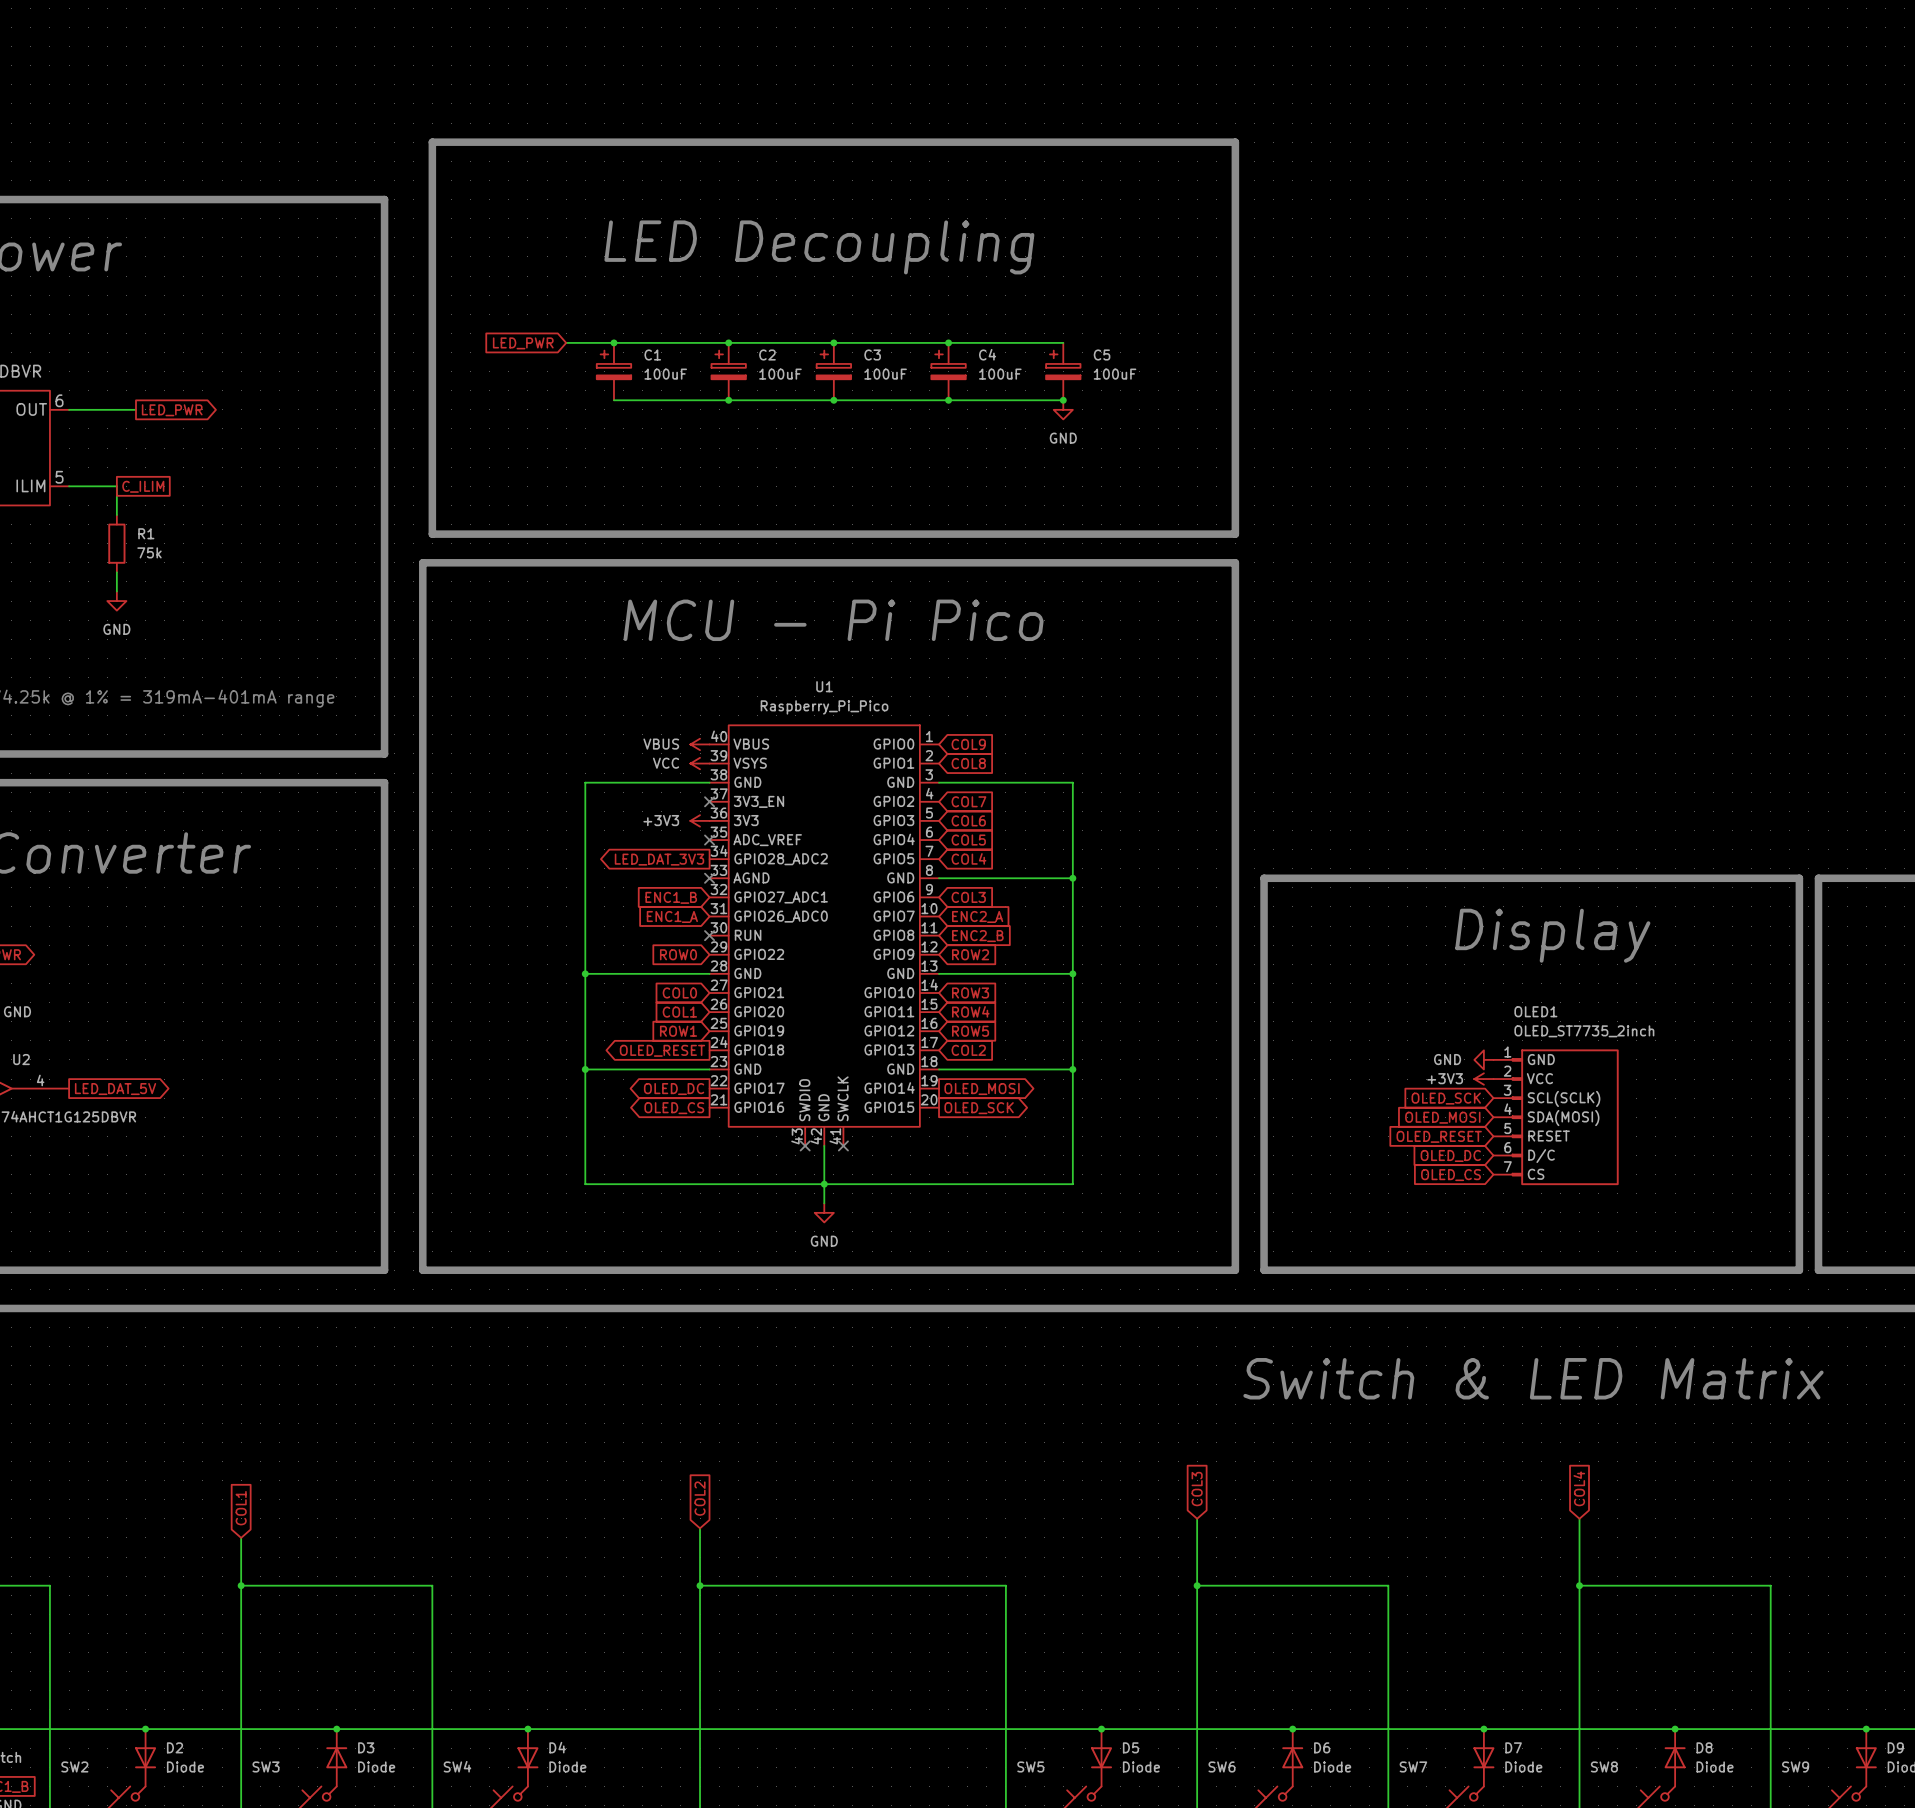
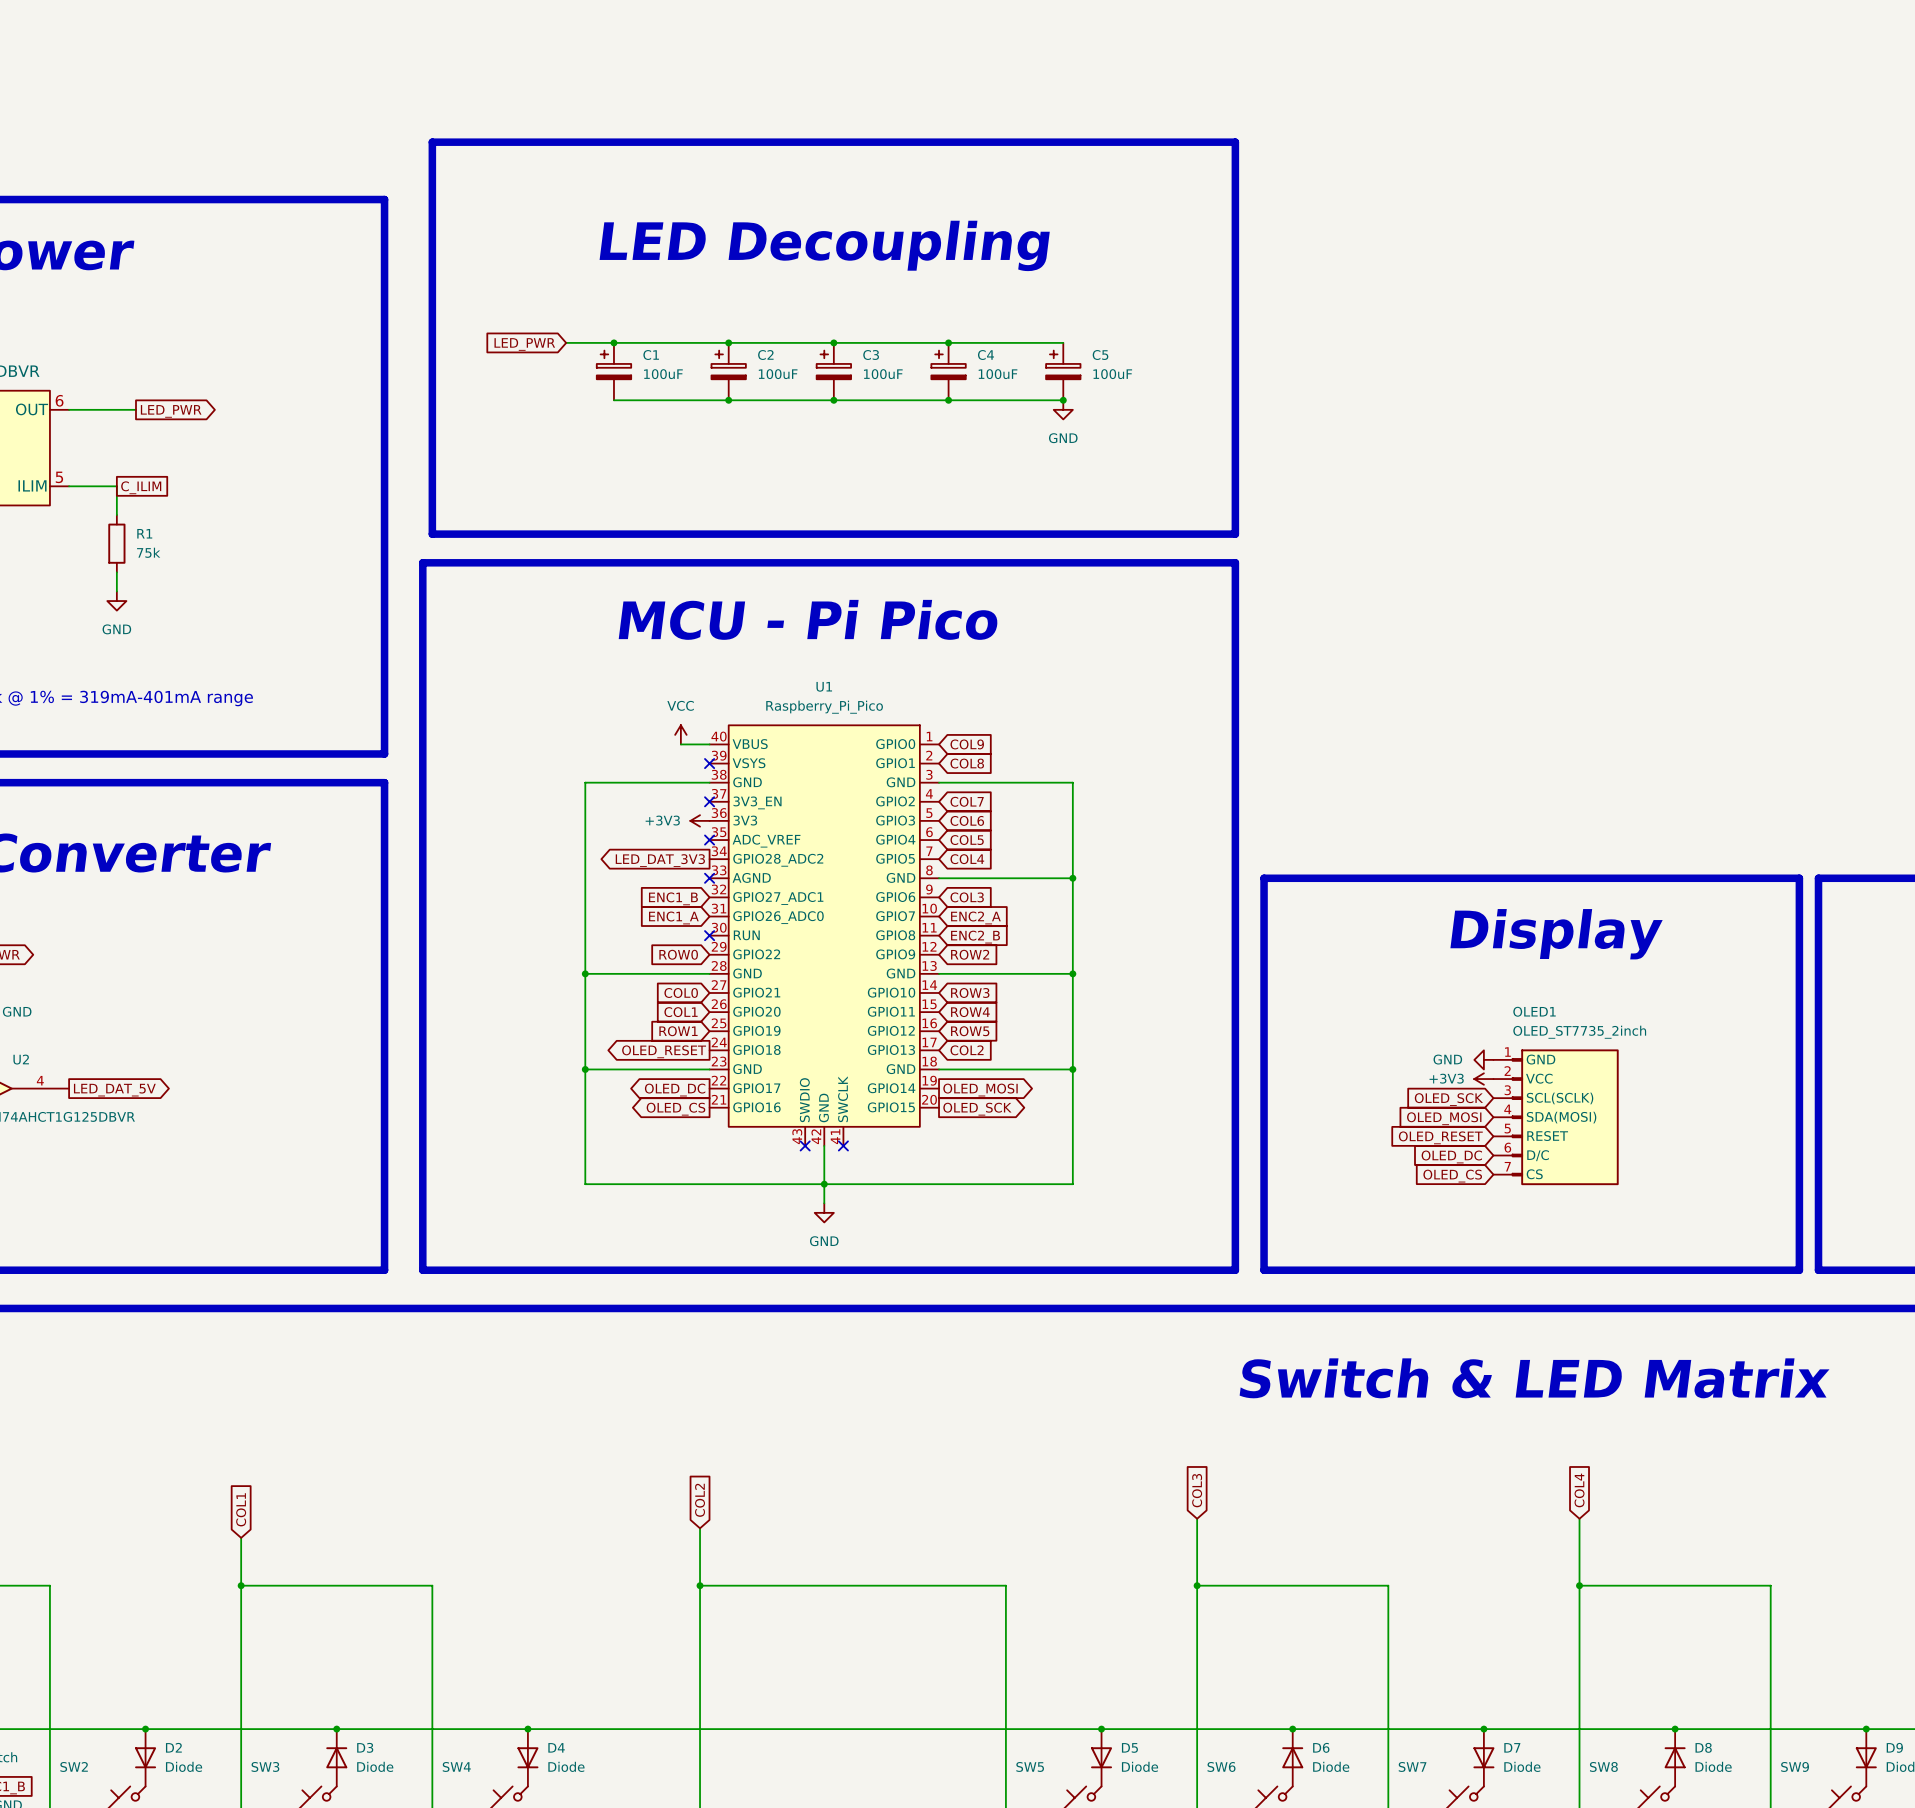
power symbol: VBUS (700, 744) -> none
power symbol rotation: 0° (700, 763) -> 90° clockwise (680, 734)
power symbol position: VCC (700, 763) -> VCC (680, 734)
no-connect mark: none -> (709, 763)

